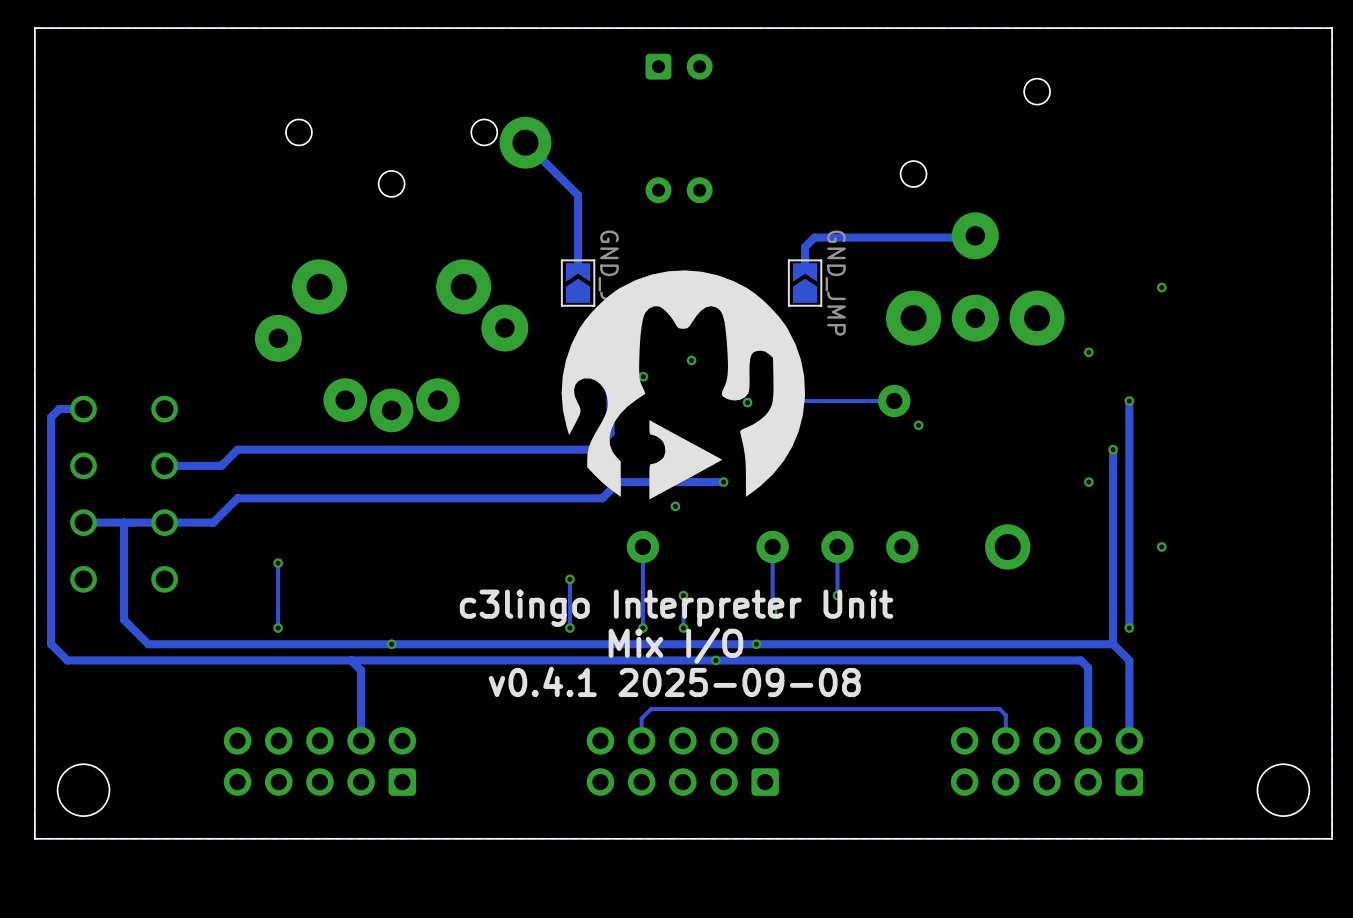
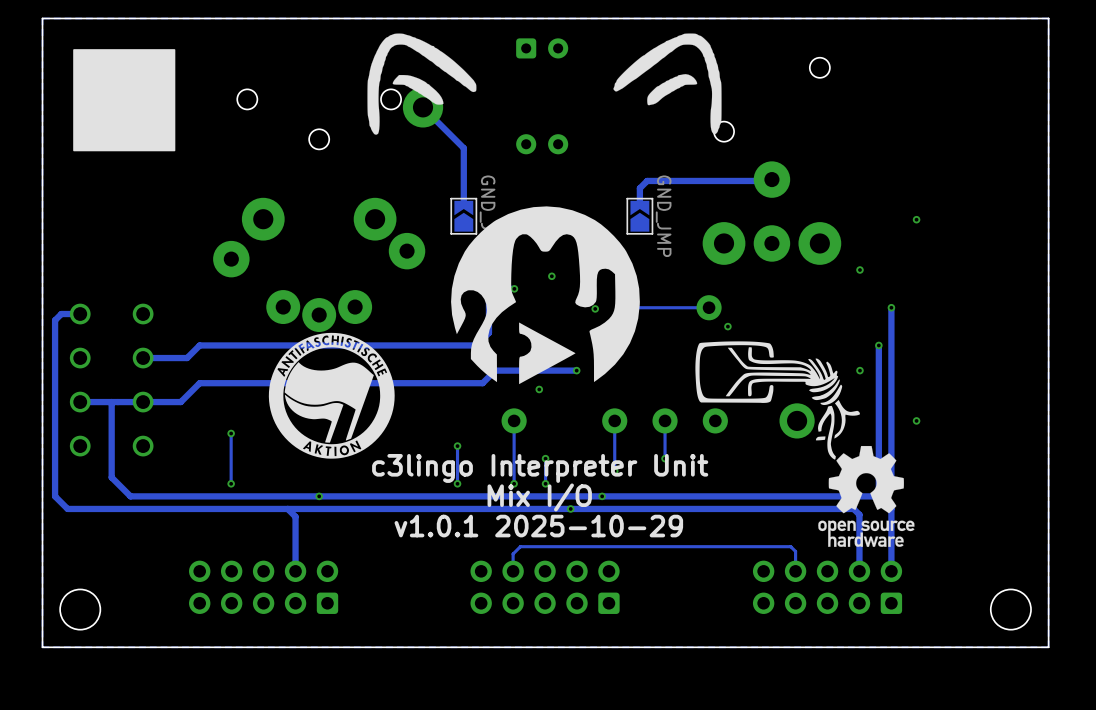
drawing: none -> [367, 33, 722, 135]
drawing: none -> [73, 49, 176, 152]
drawing: none -> [268, 332, 395, 459]
drawing: none -> [695, 341, 915, 547]
text: v0.4.1 2025-09-08 (674, 681) -> v1.0.1 2025-10-29 (538, 526)

